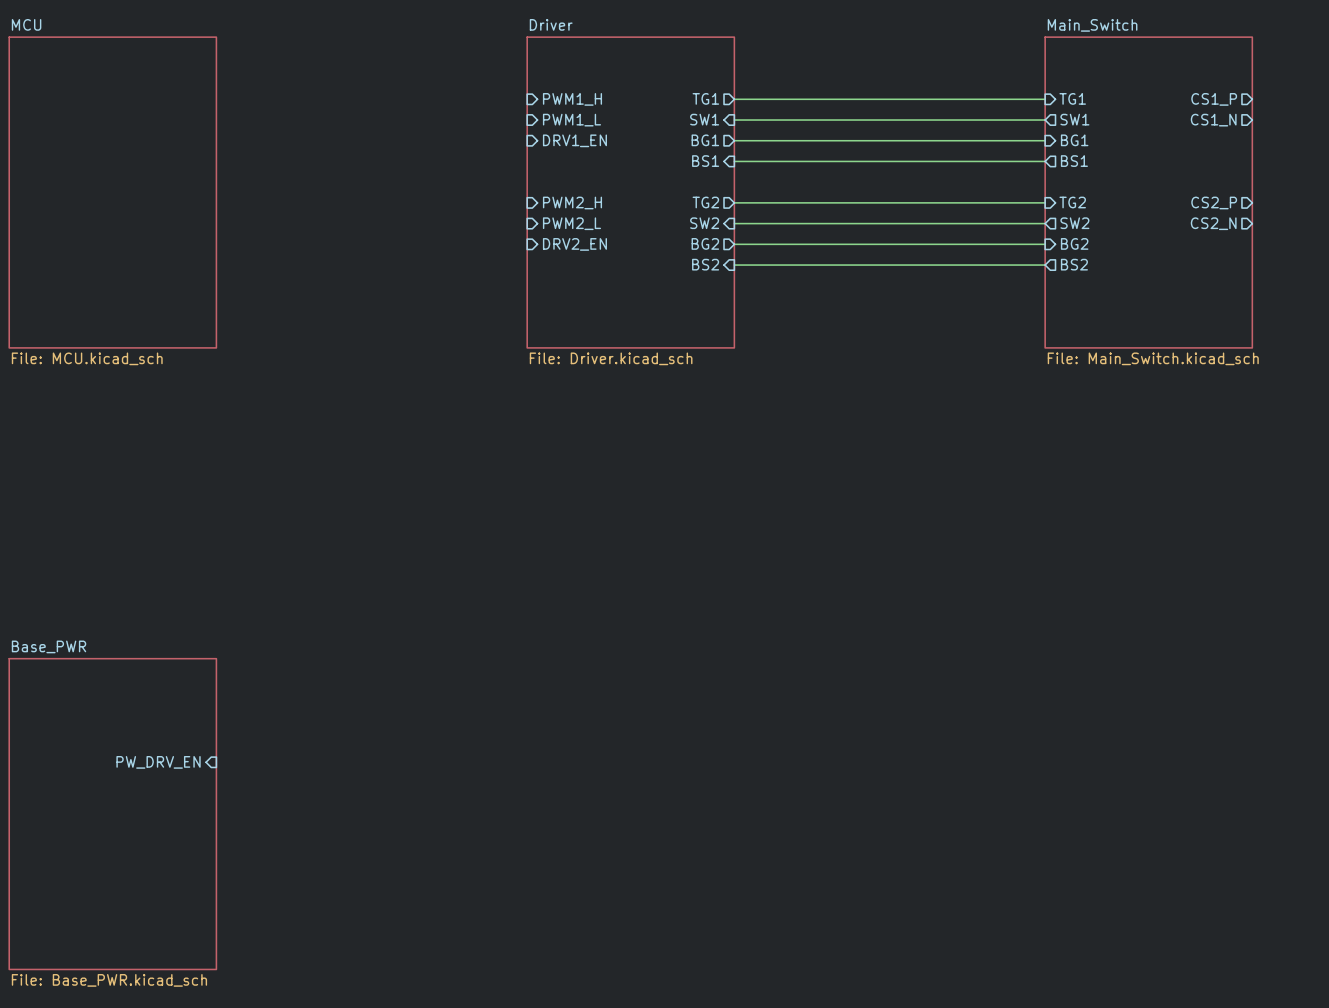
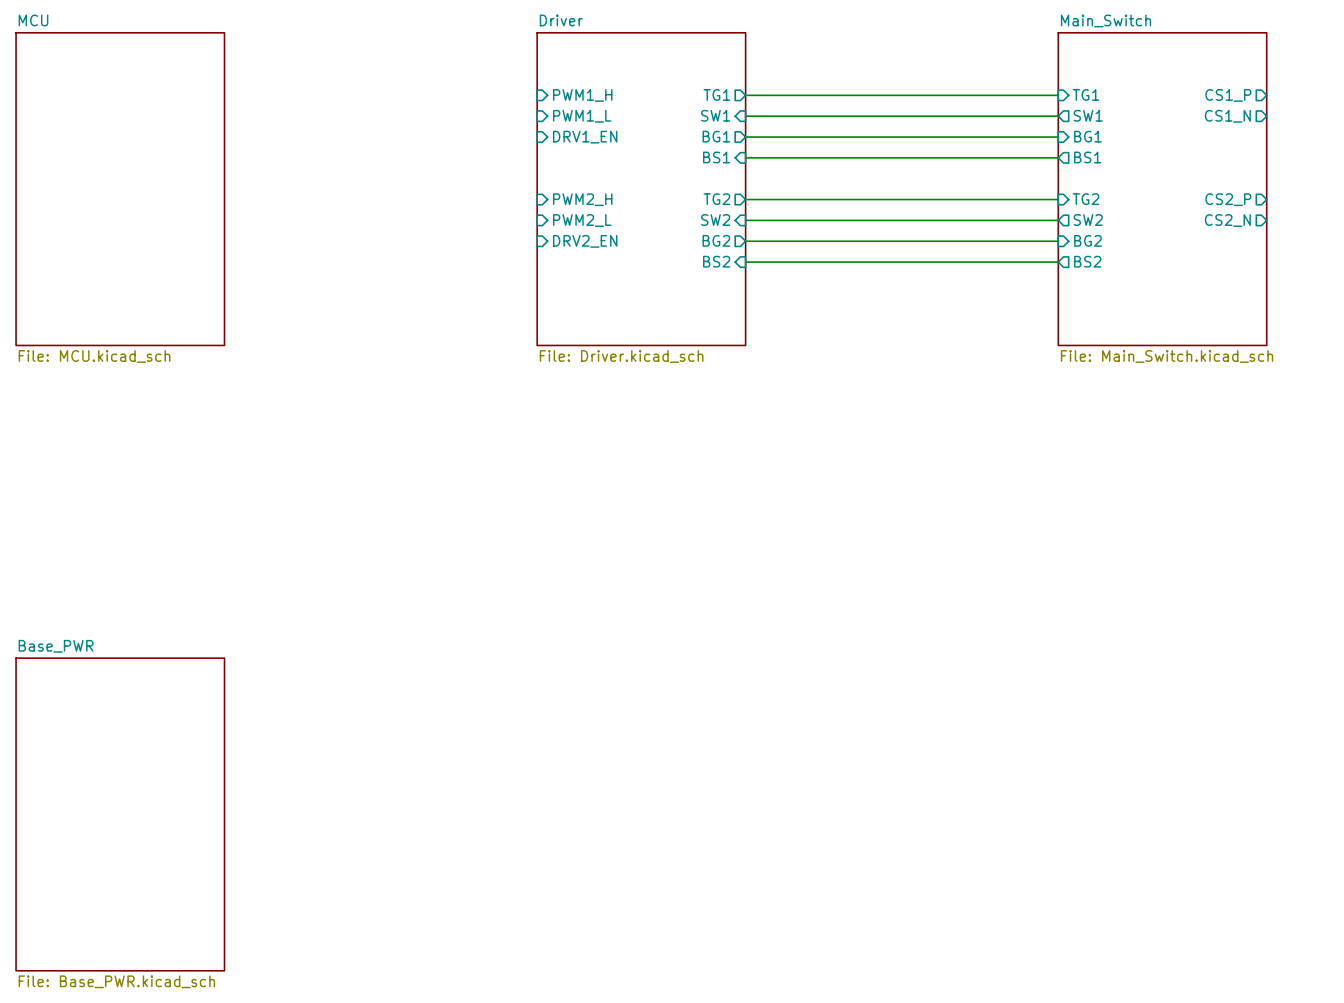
sheet pin: PW_DRV_EN (158, 762) -> none

